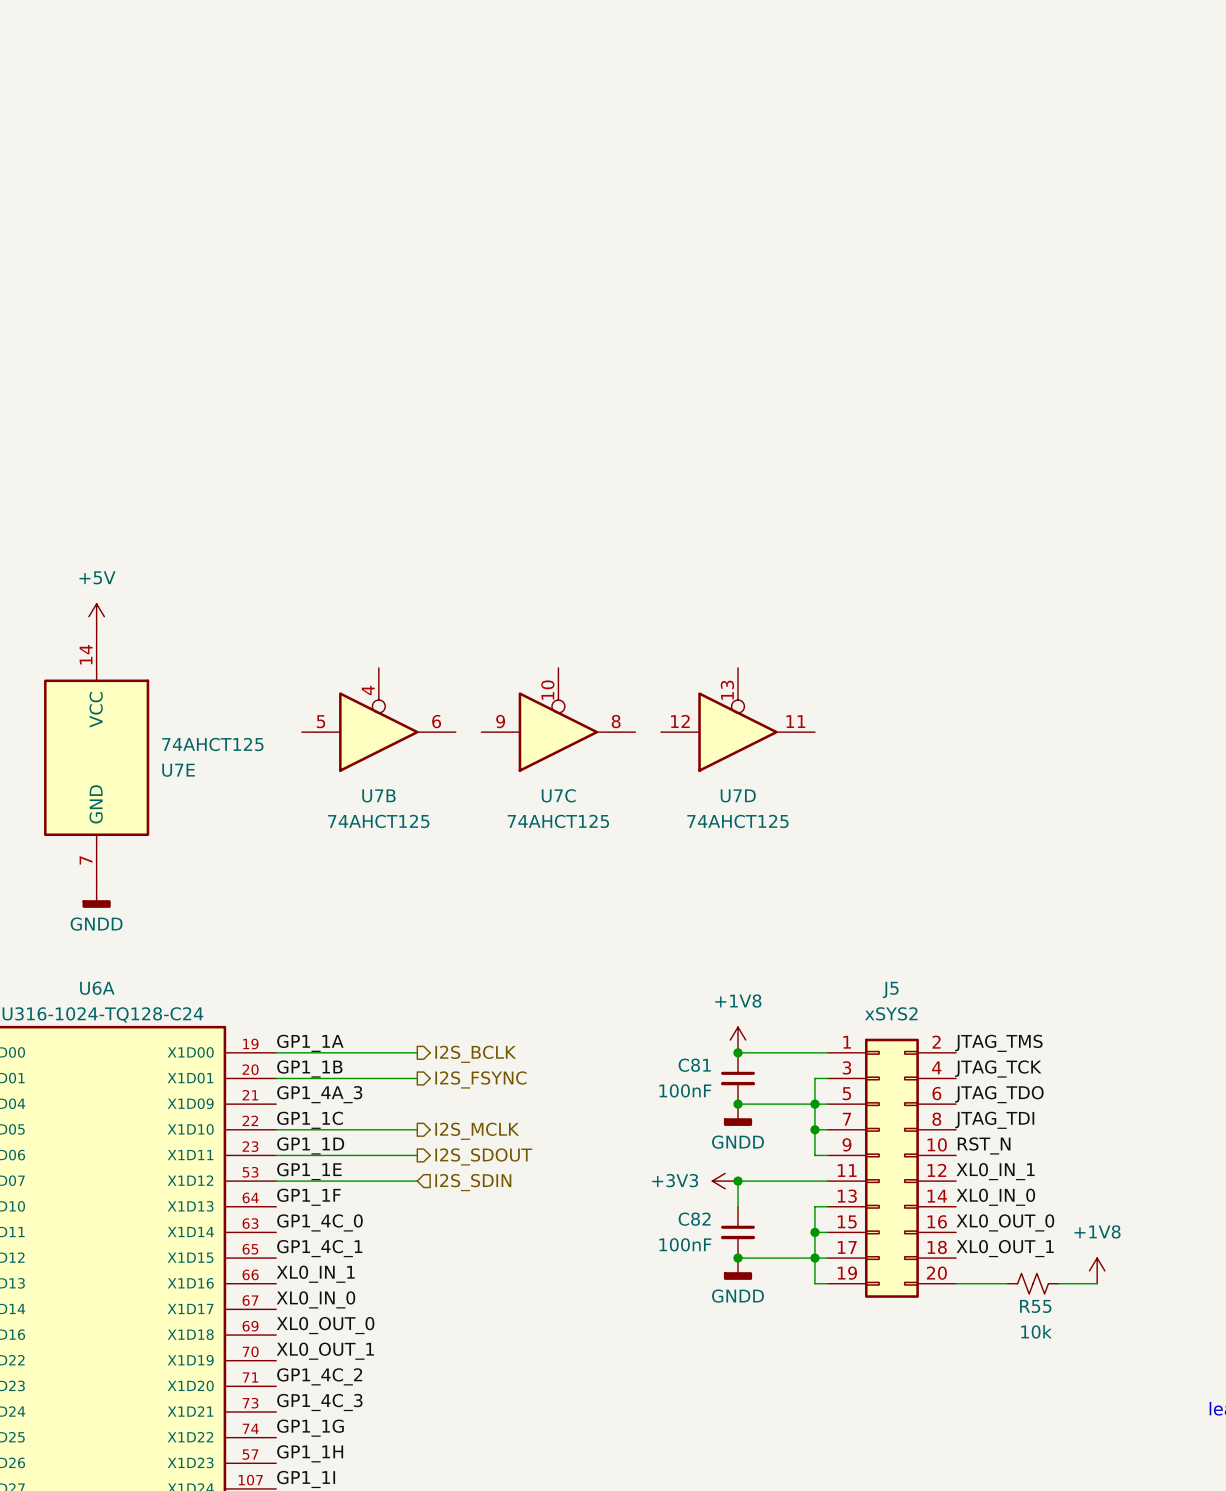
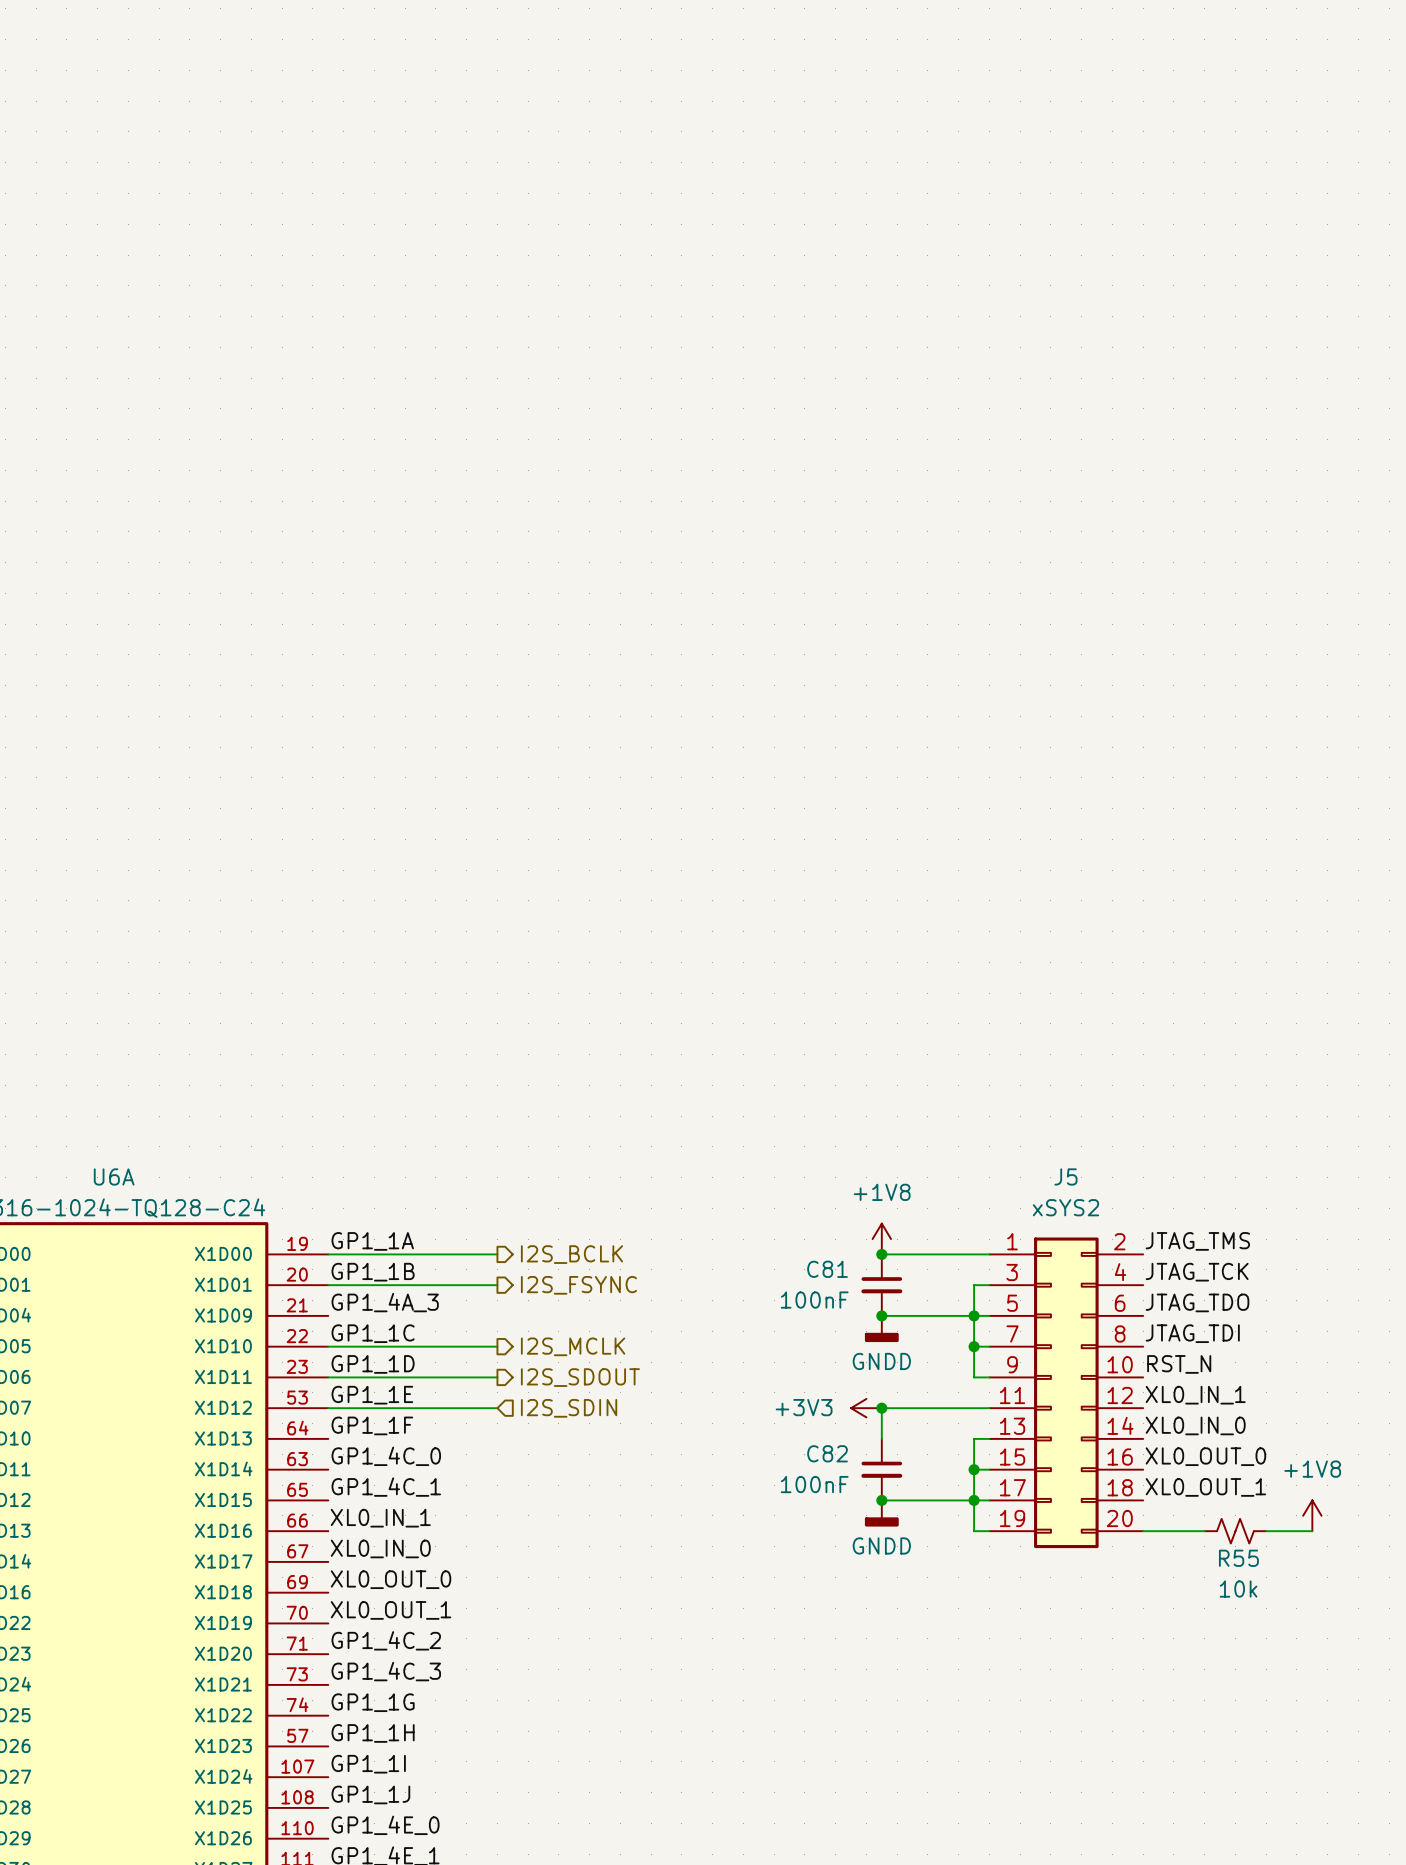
power symbol: +5V (96, 616) -> none
U7B: 74AHCT125 (378, 719) -> none
U7C: 74AHCT125 (558, 719) -> none
U7D: 74AHCT125 (738, 719) -> none
U7E: 74AHCT125 (96, 757) -> none
power symbol: GNDD (96, 896) -> none

